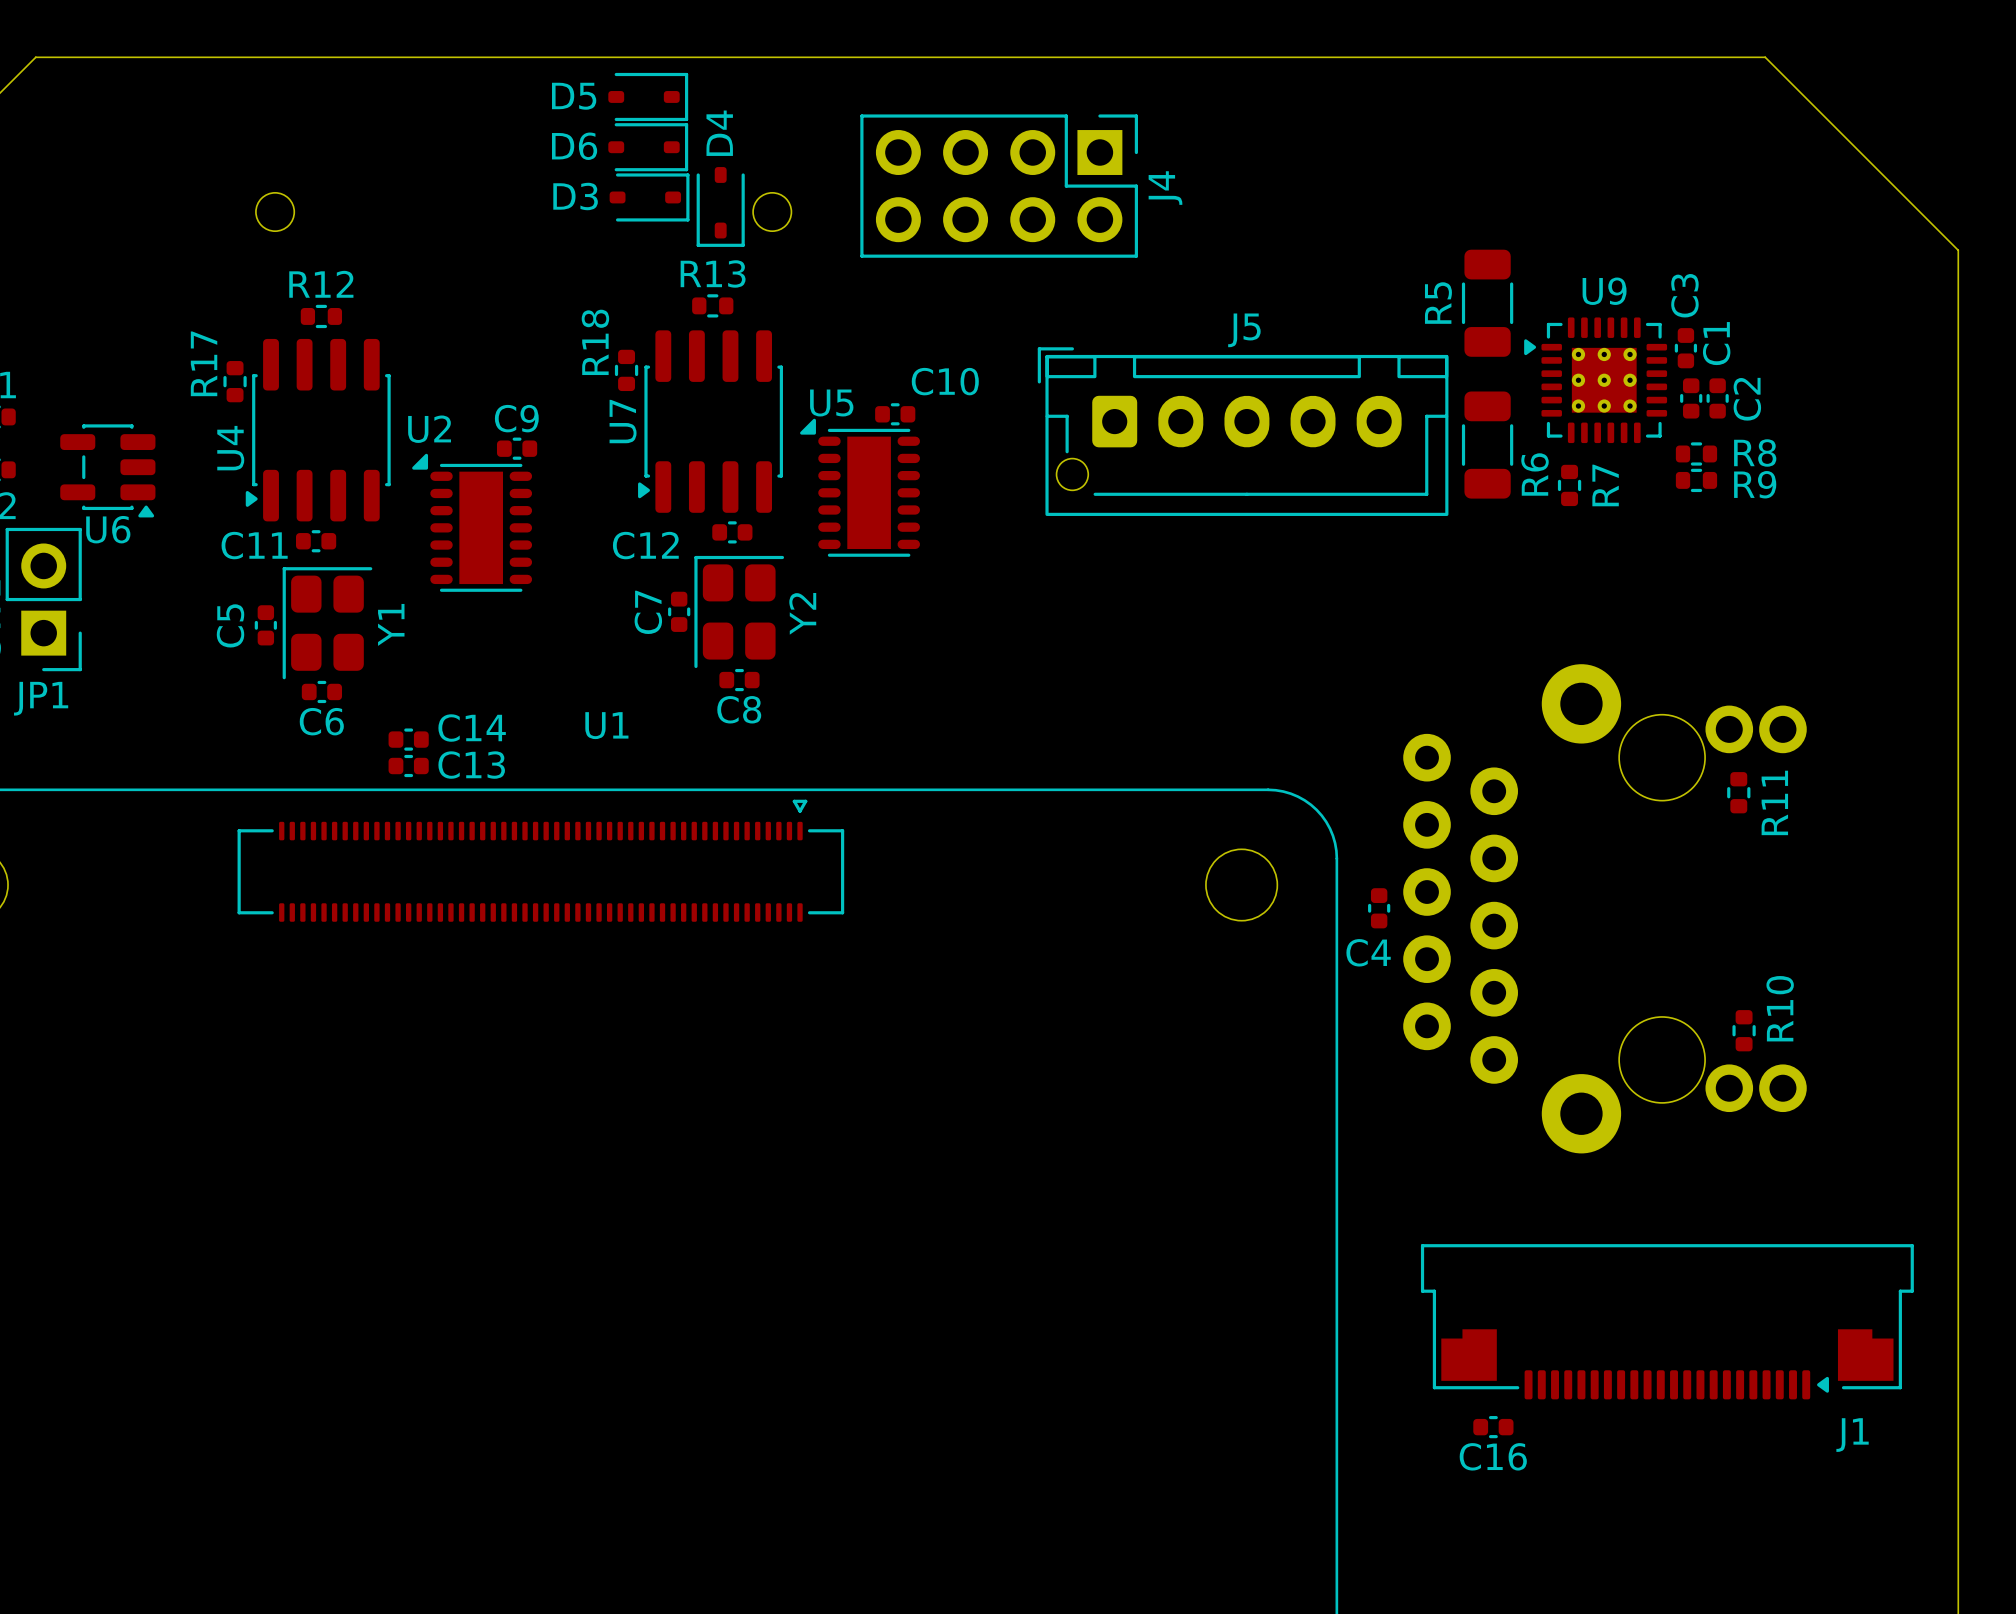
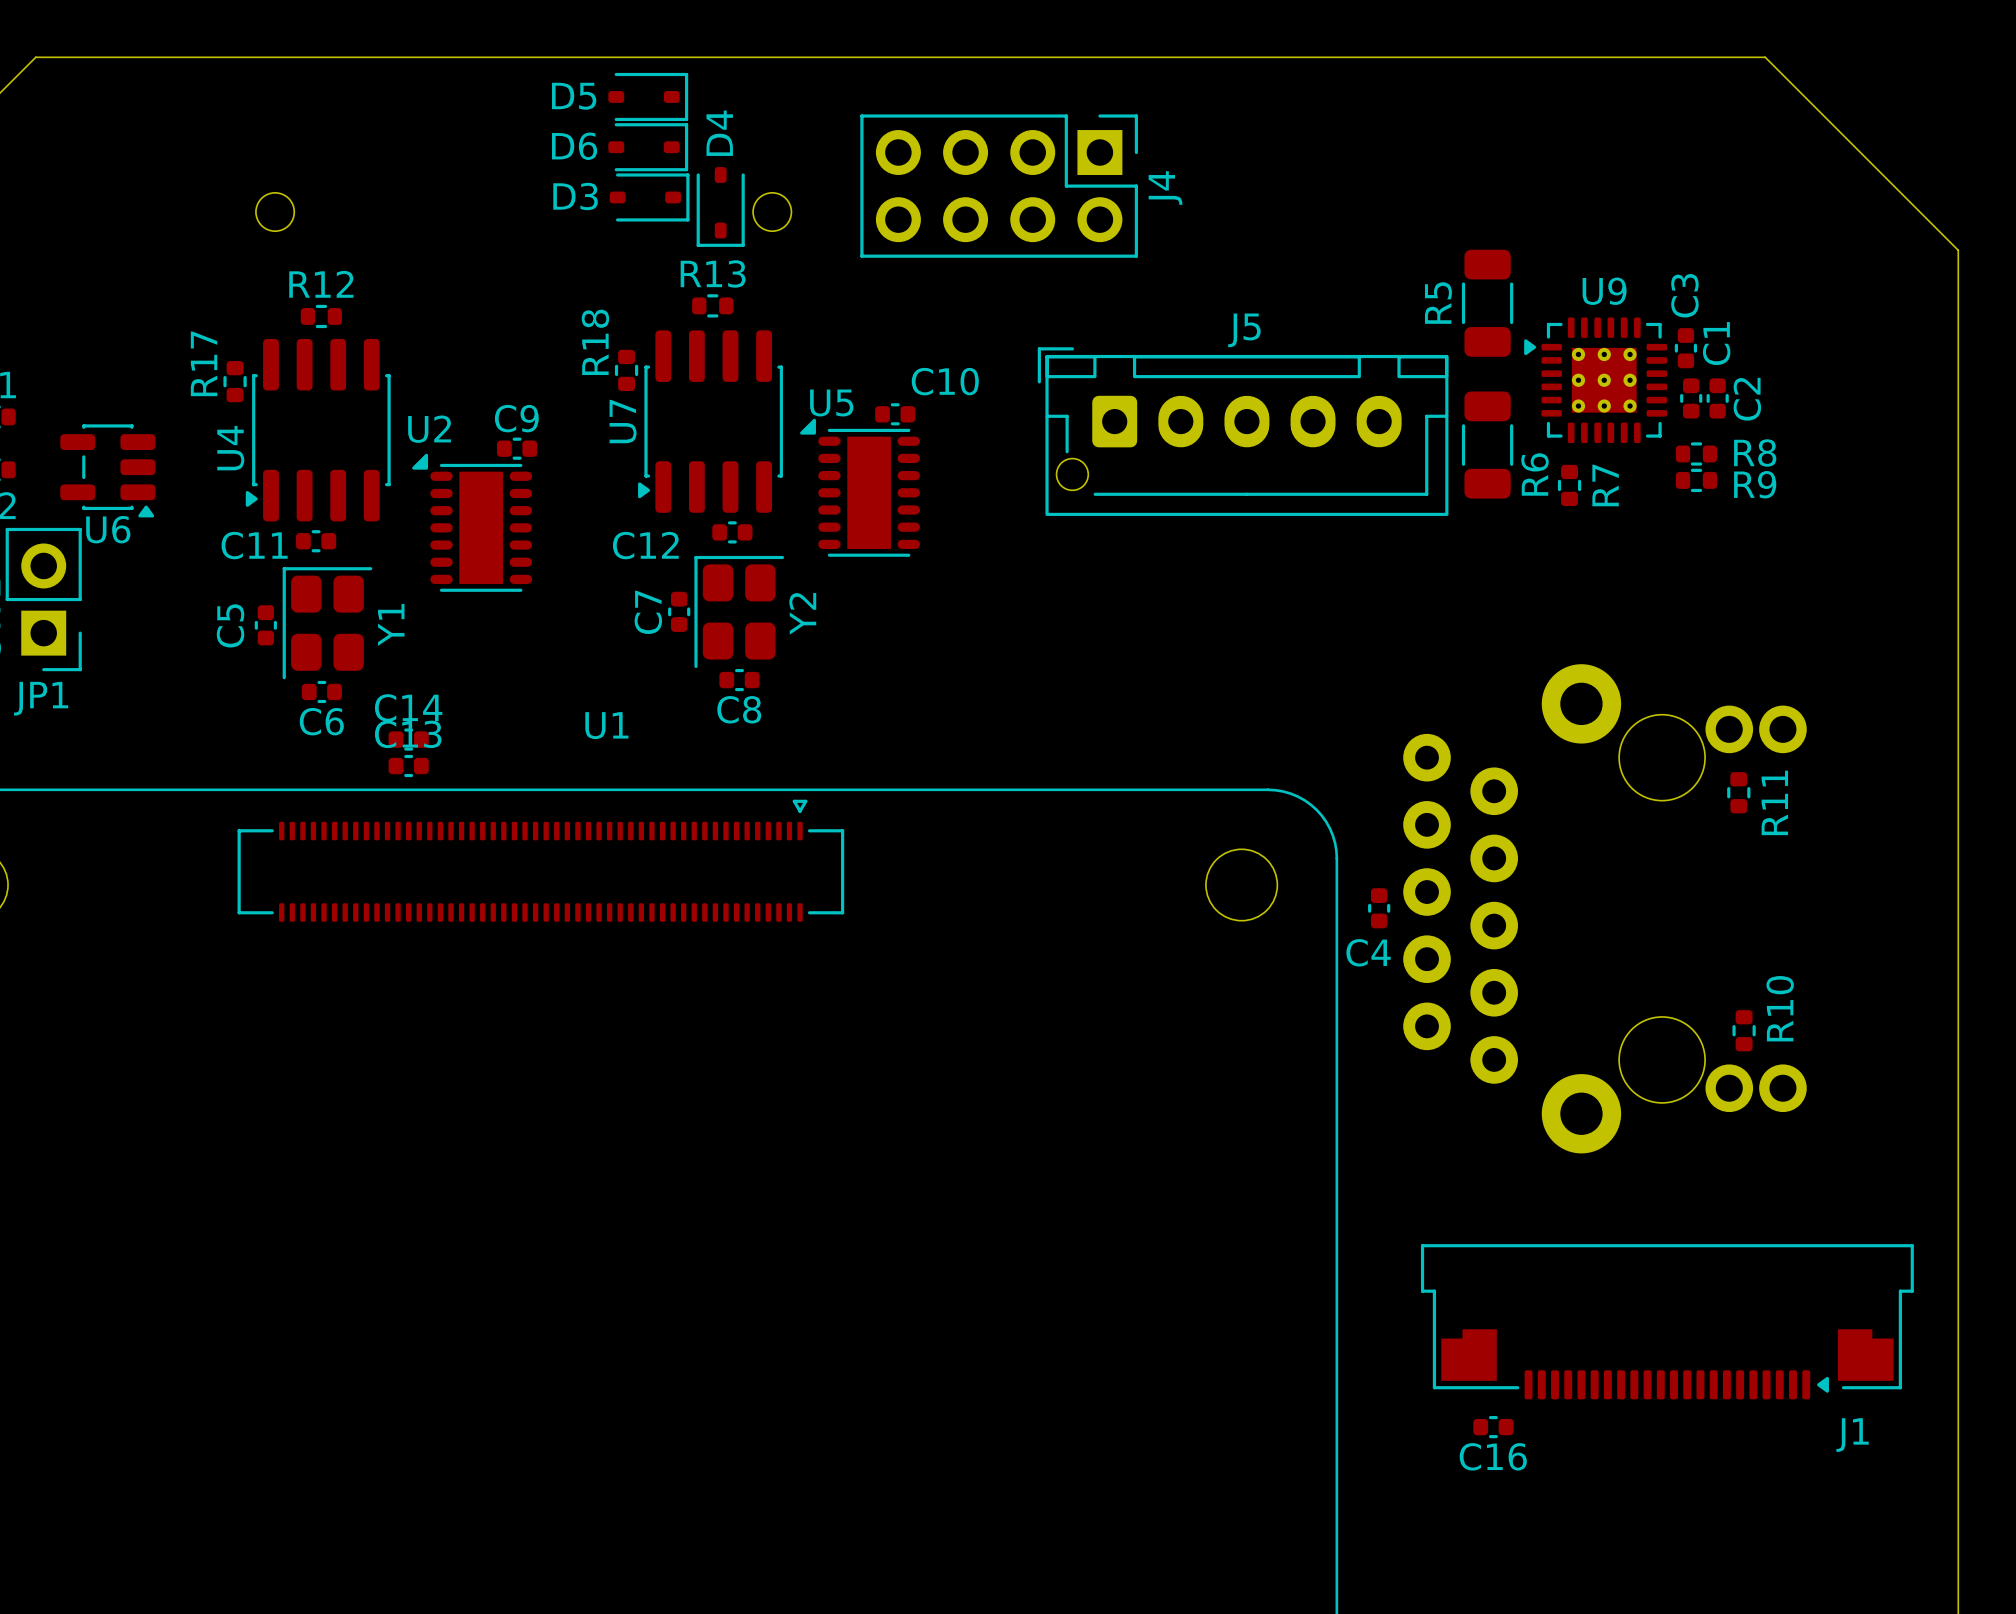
C14 name position: C14 (472, 728) -> C14 (408, 707)
C13 name position: C13 (471, 765) -> C13 (408, 734)

